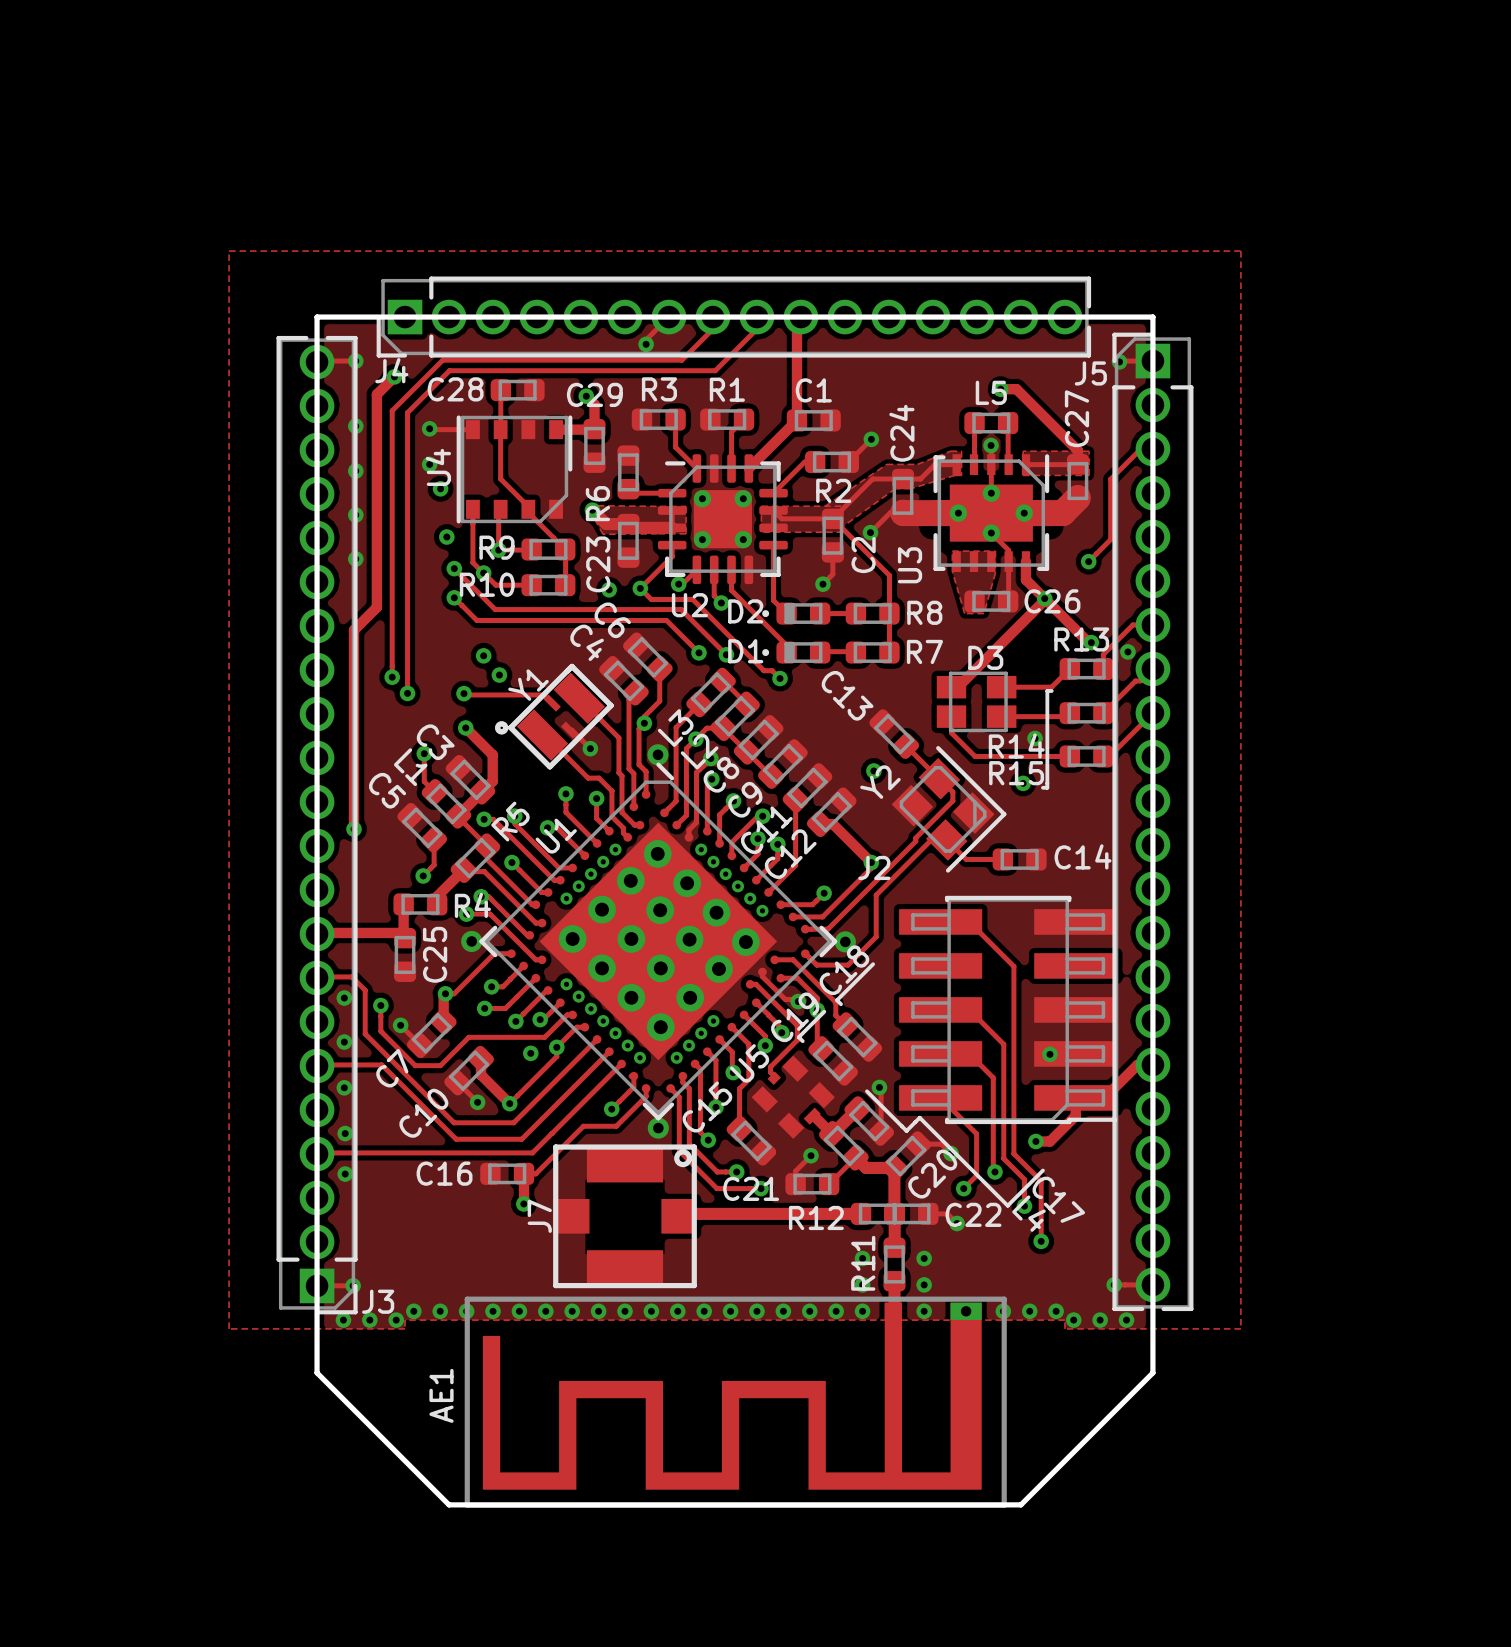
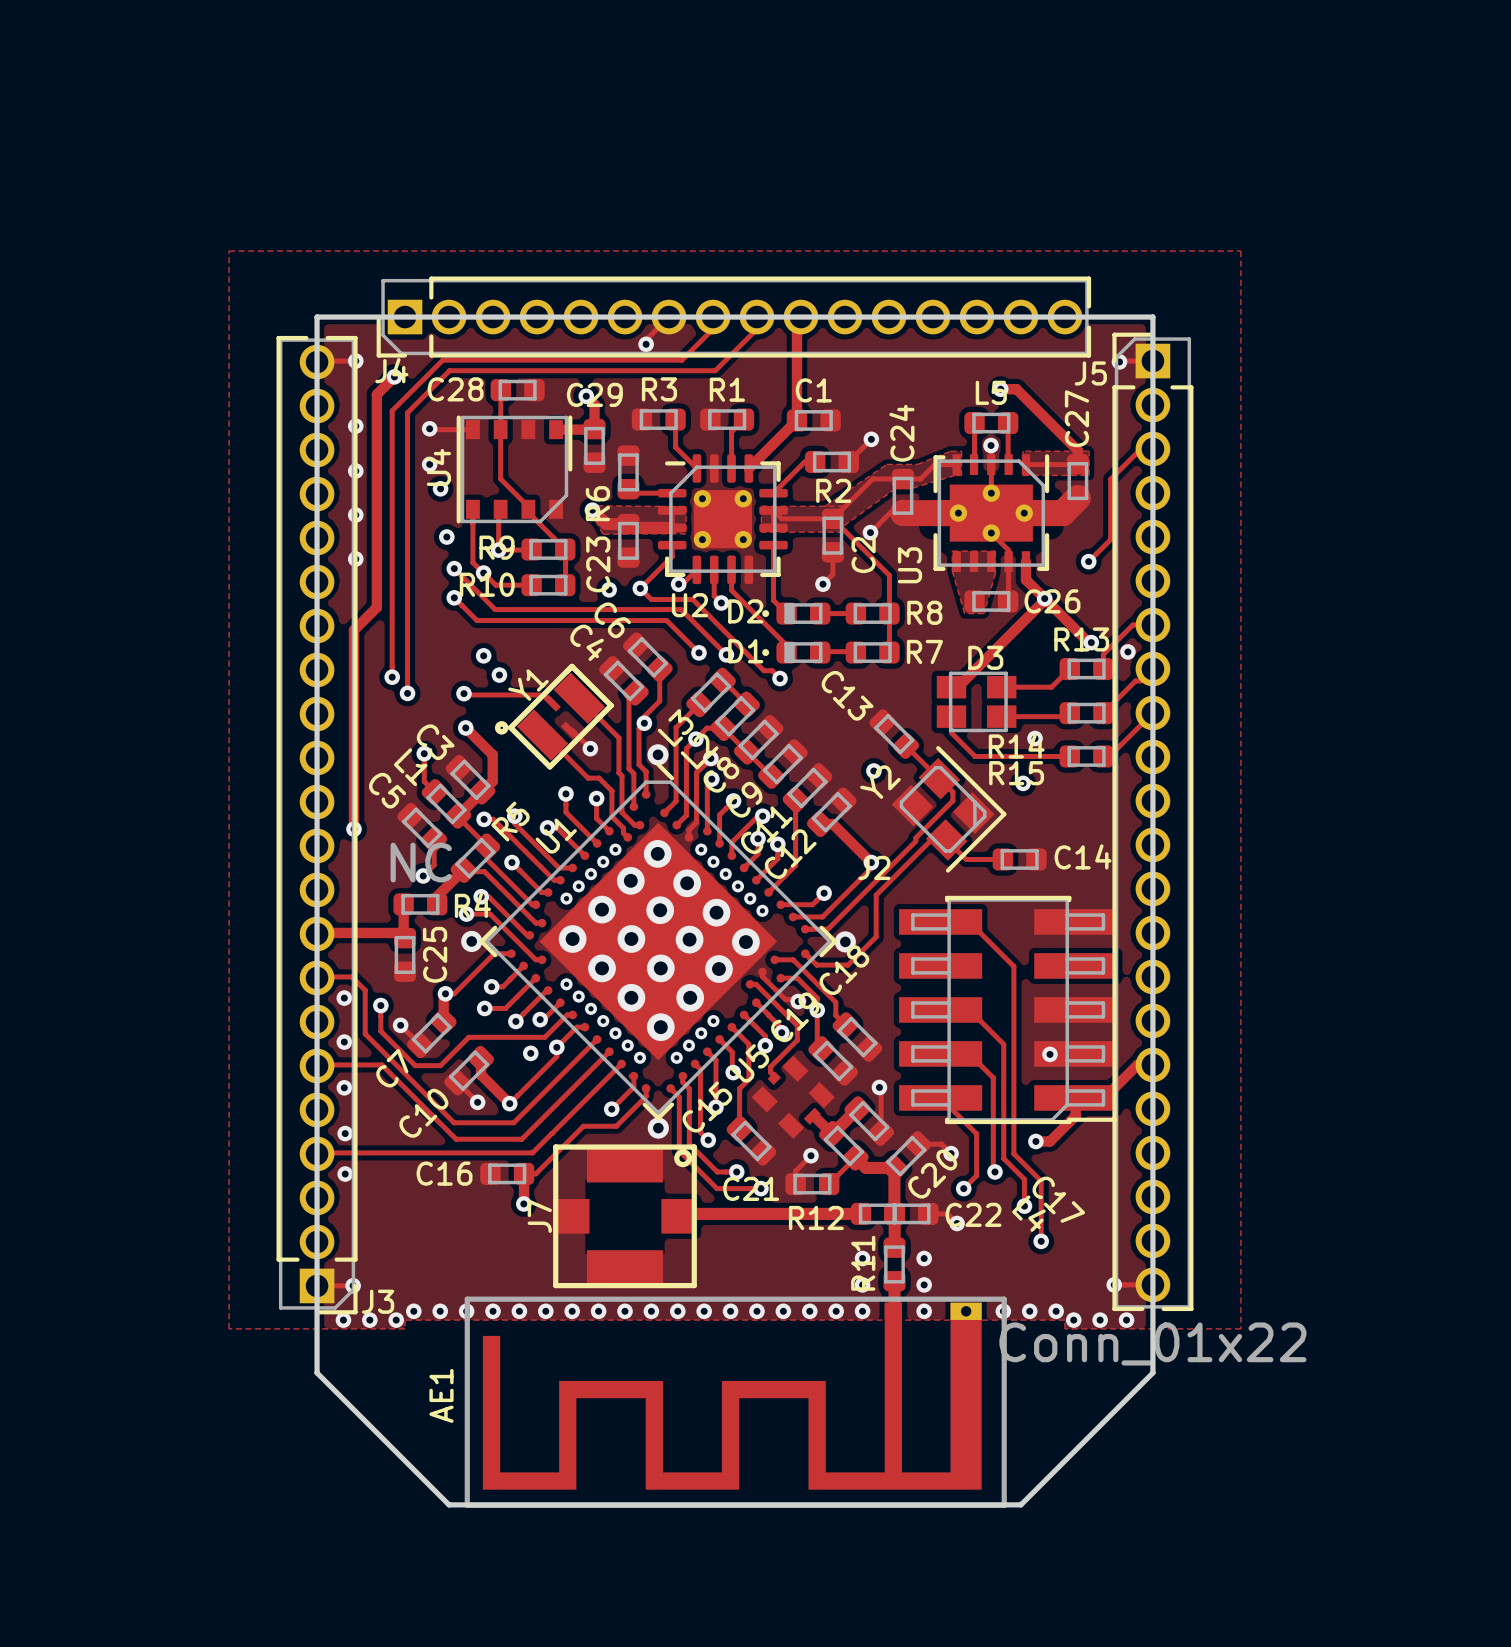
line: (1051, 690) (1047, 690) (1047, 787) (1042, 787) -> none
R4 value: none -> NC (421, 862)
line: (873, 964) (837, 1000) (841, 1004) -> none
line: (824, 1011) (798, 1037) (802, 1041) -> none
line: (866, 1091) (906, 1130) (919, 1117) (1007, 1205) (1042, 1170) -> none
J5 value: none -> Conn_01x22 (1152, 1343)

